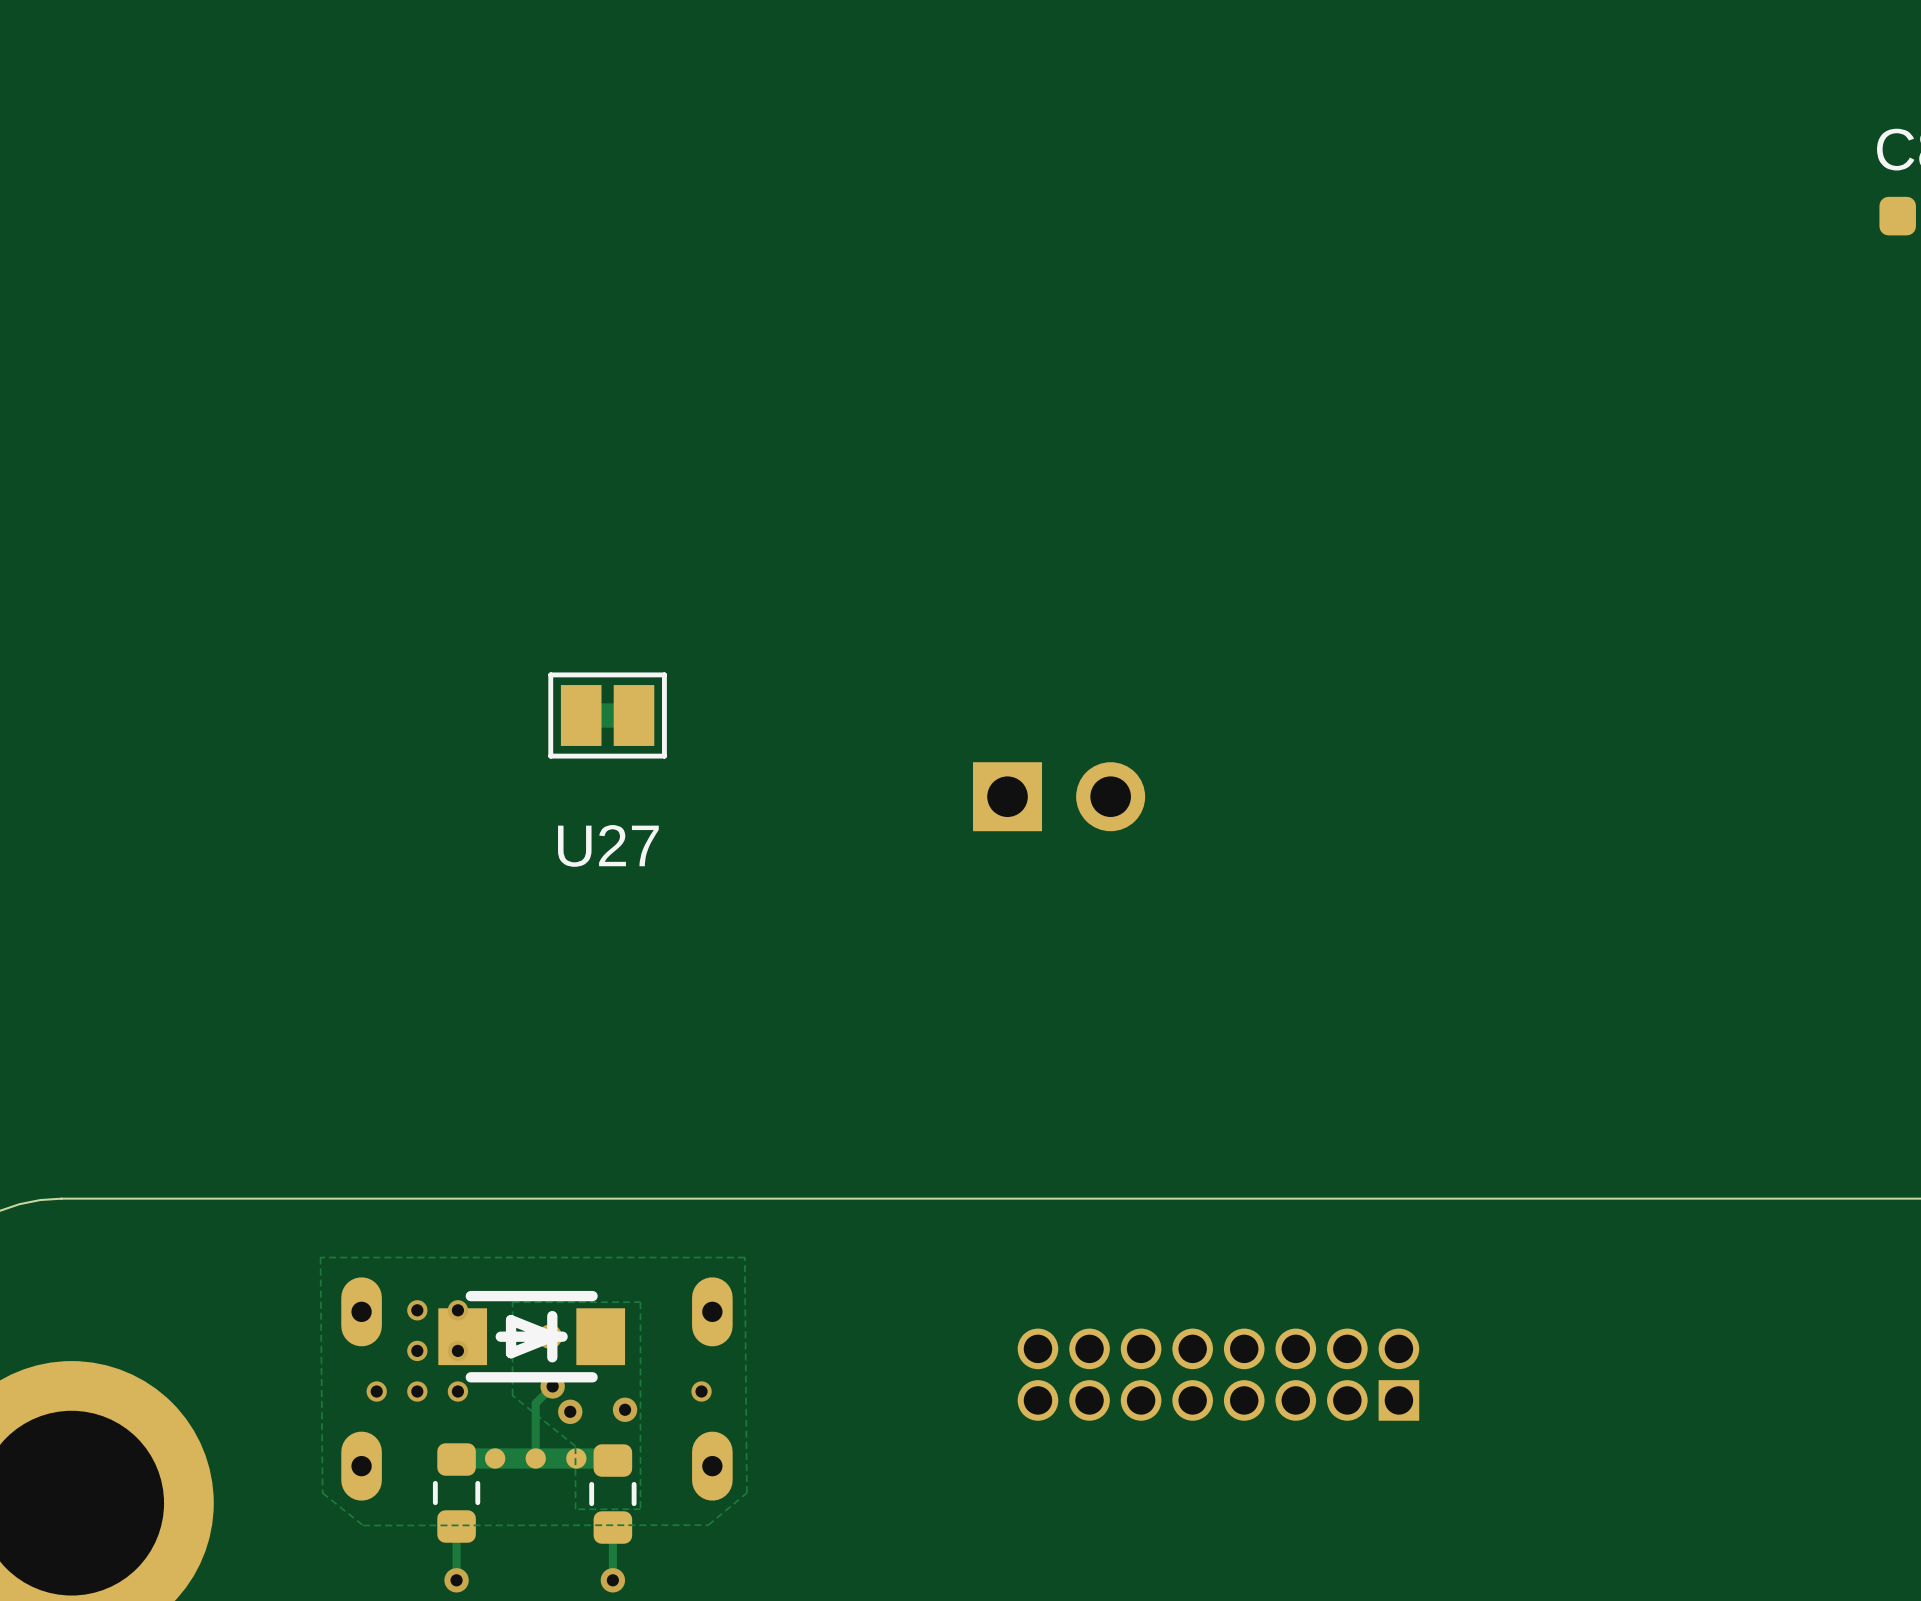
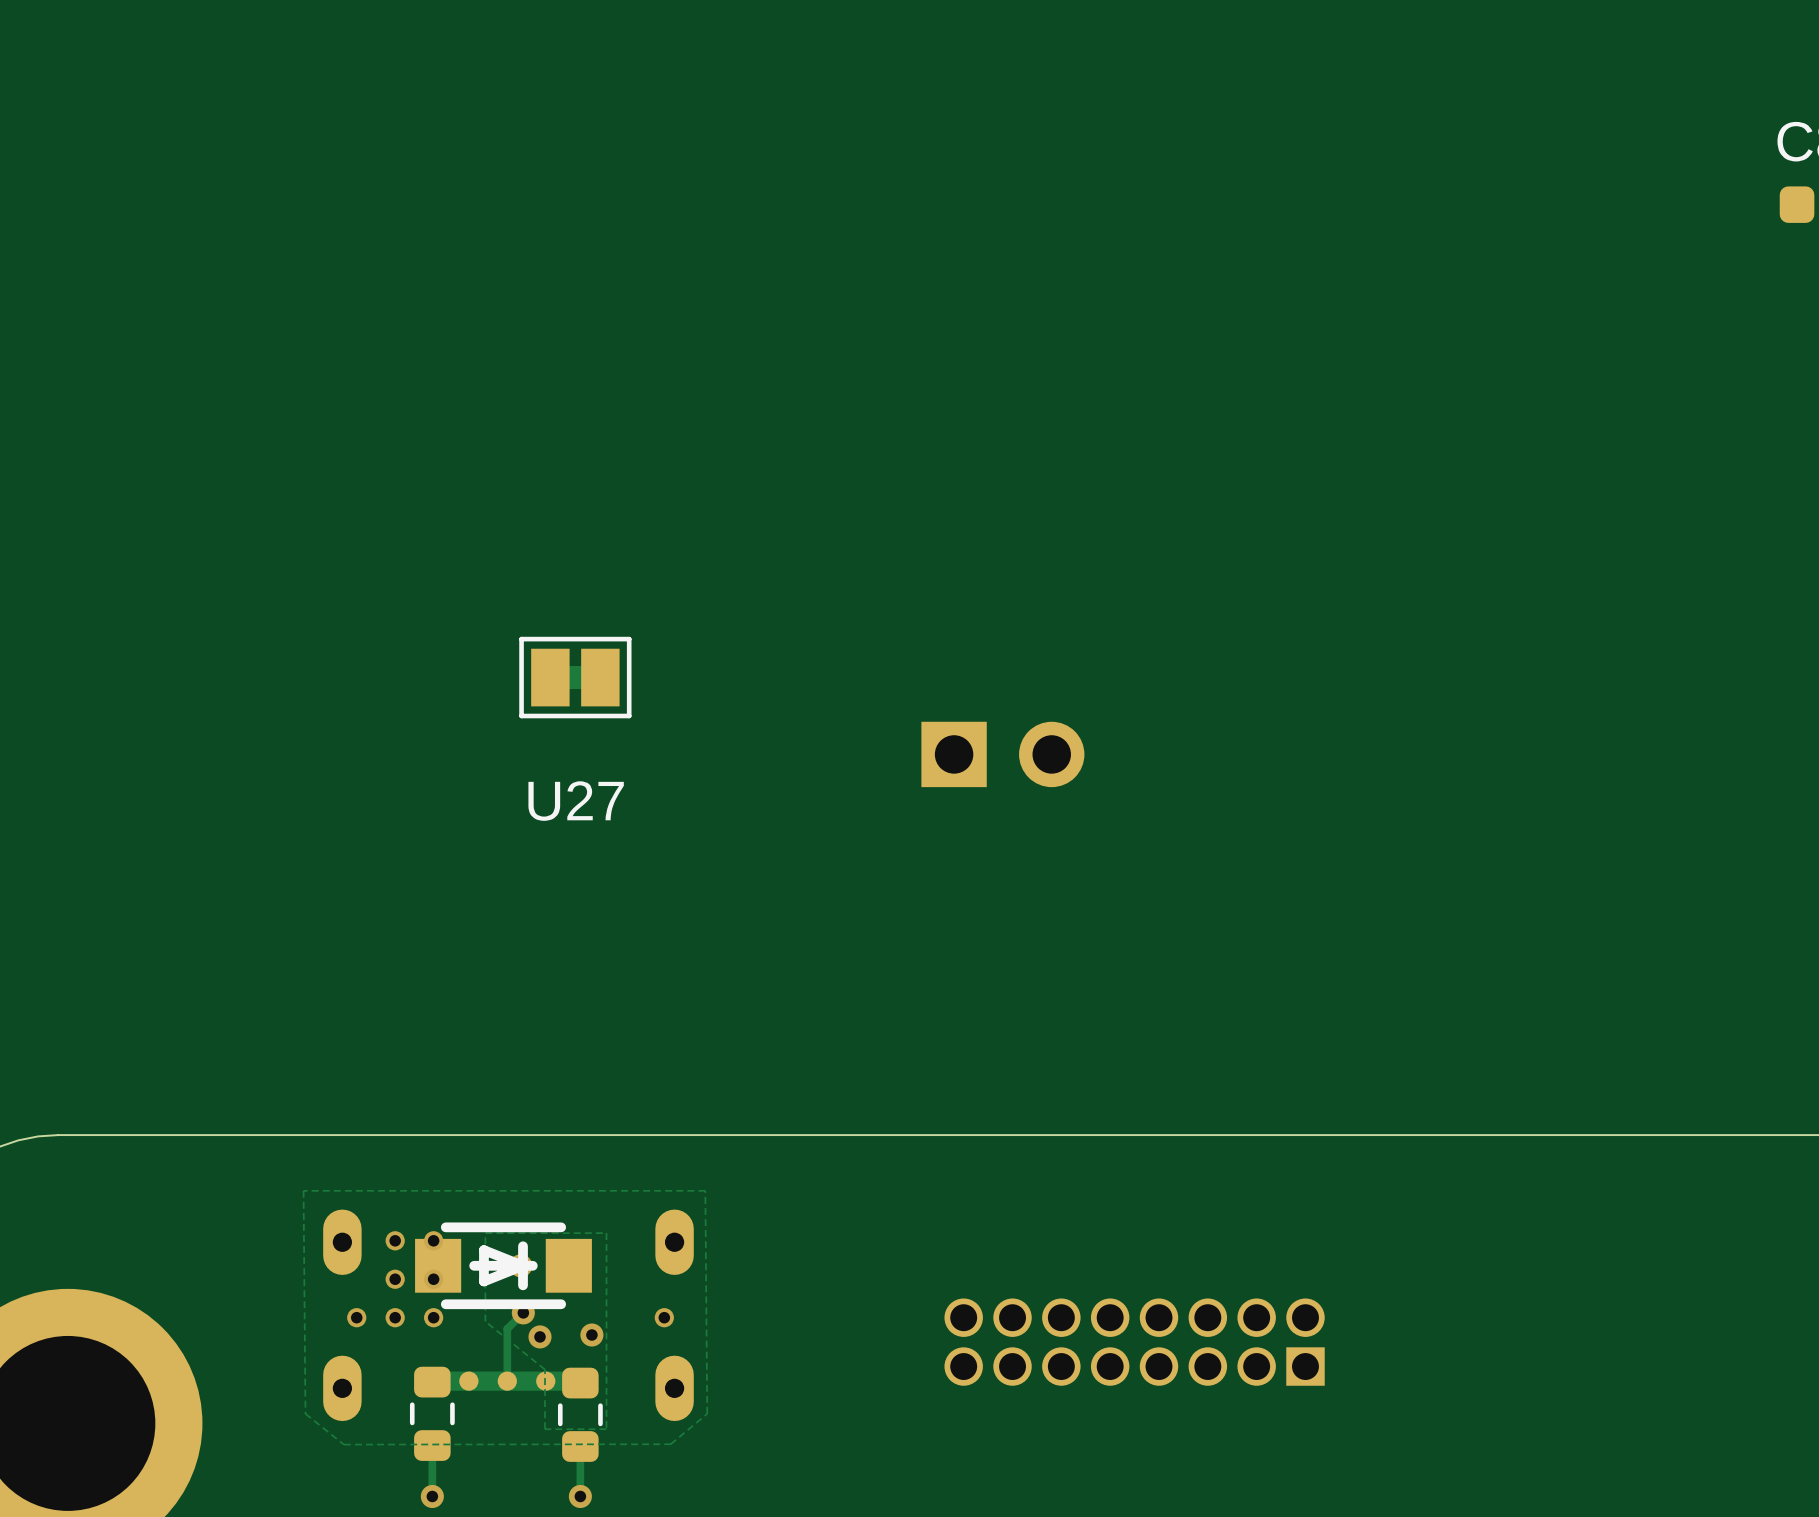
part position: (1218, 1374) -> (1134, 1342)

